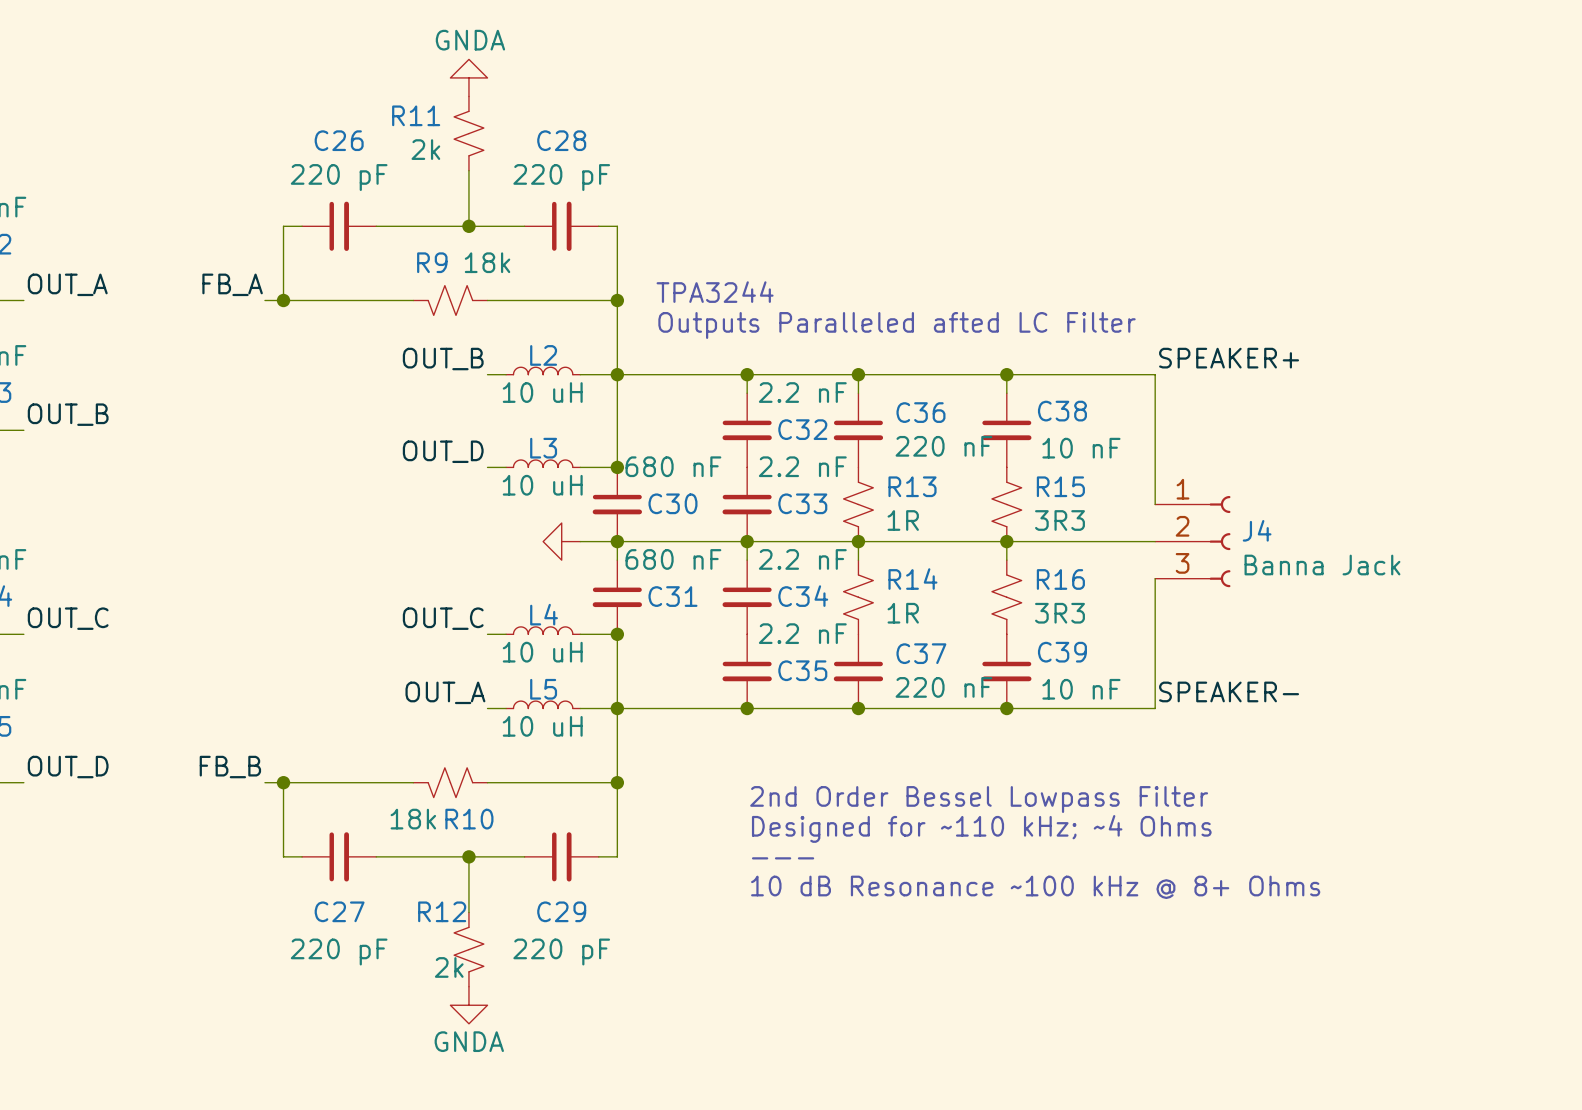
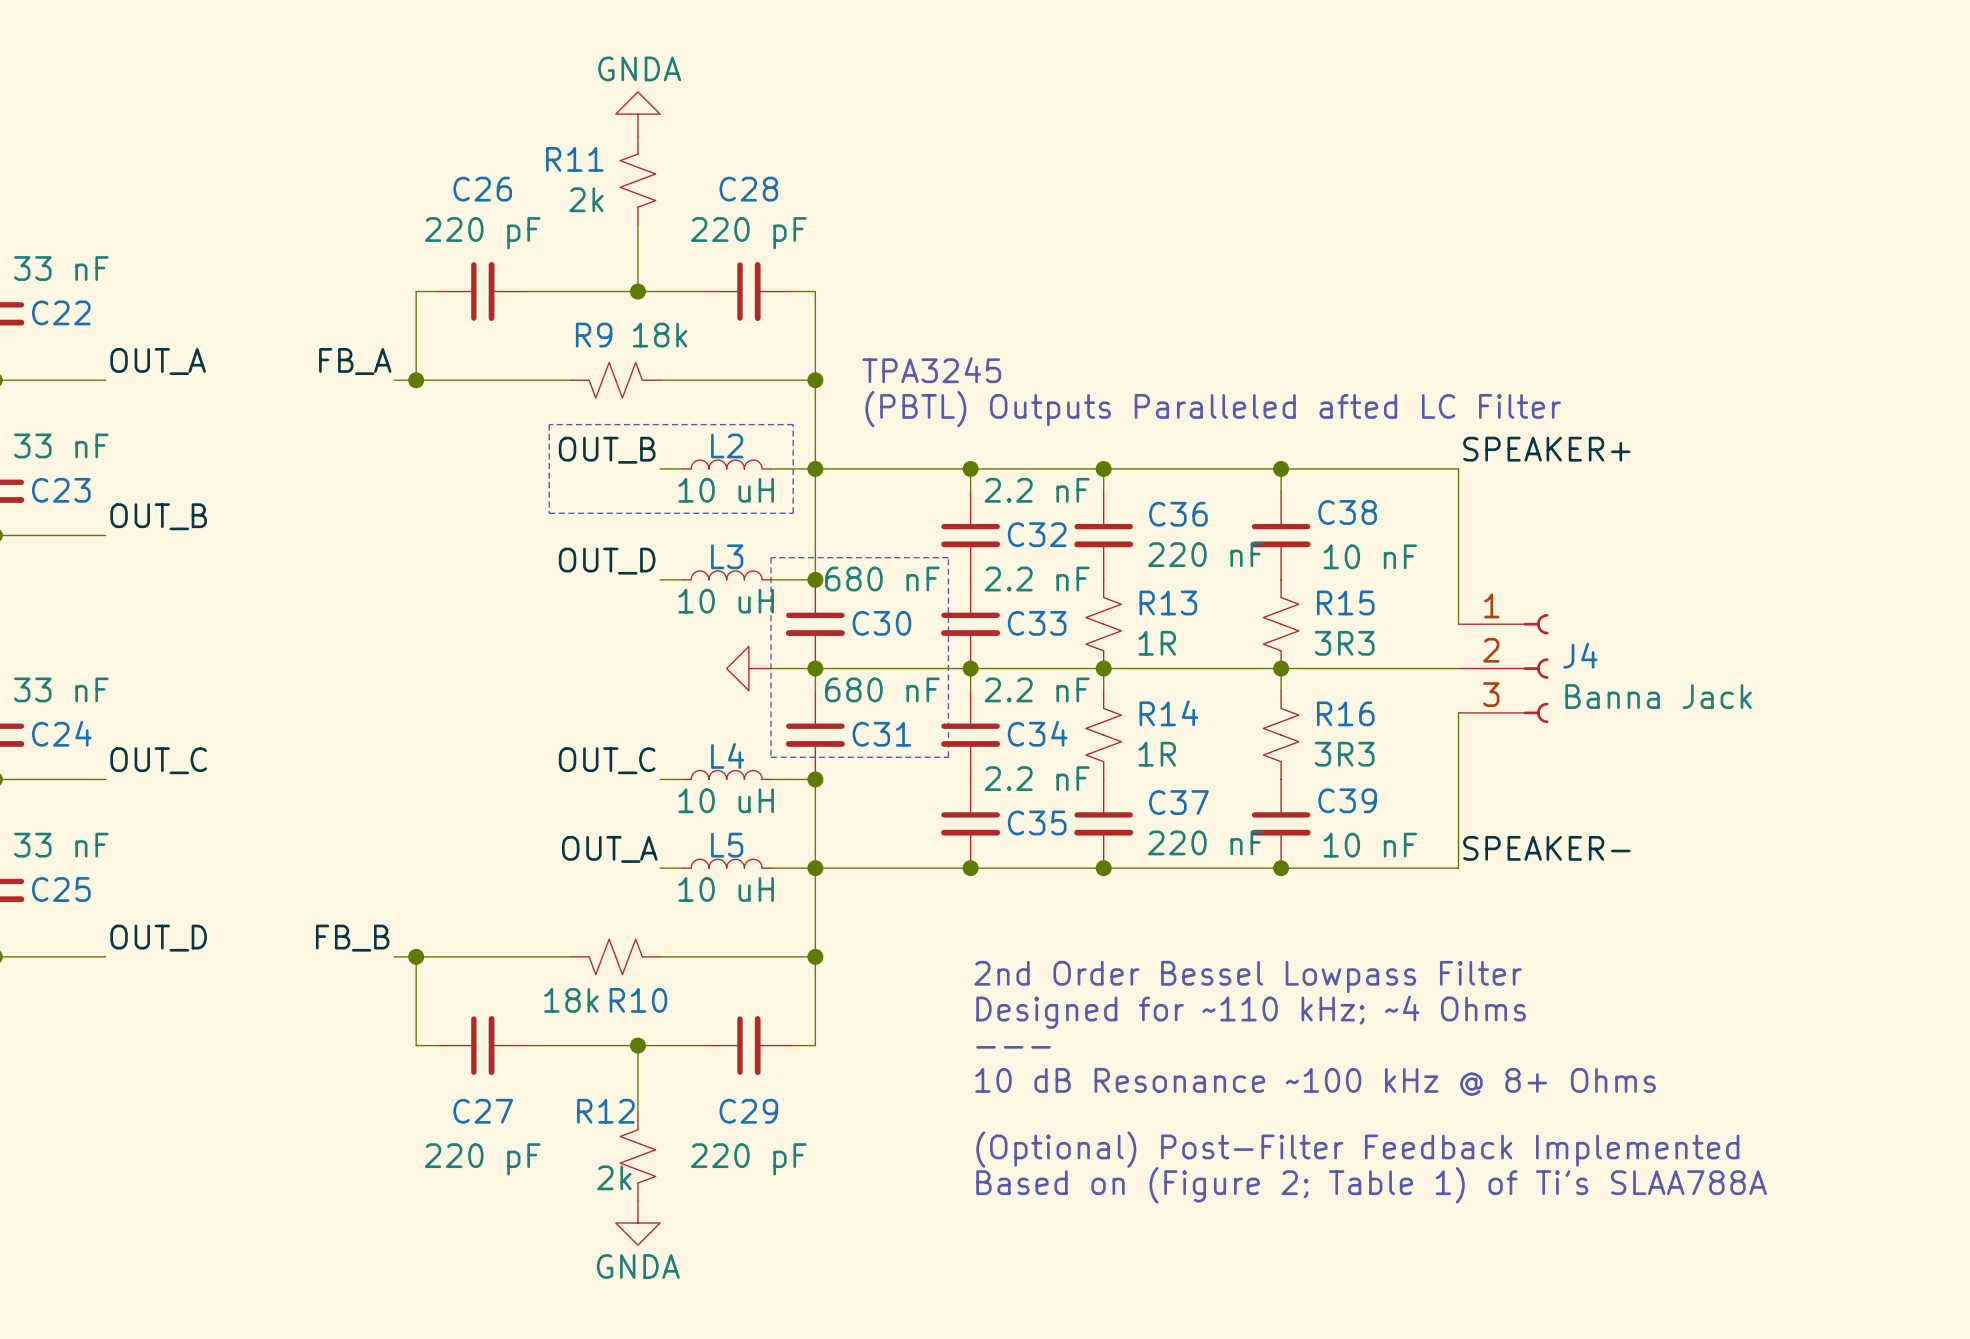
text: TPA3244 (715, 292) -> TPA3245 (931, 370)
text: Outputs Paralleled afted LC Filter (897, 325) -> (PBTL) Outputs Paralleled afted LC Filter (1213, 409)
line: none -> (549, 424) (793, 424) (793, 513) (549, 513) (549, 424)
line: none -> (771, 557) (948, 557) (948, 757) (771, 757) (771, 557)
text: none -> (Optional) Post-Filter Feedback Implemented (1357, 1149)
text: none -> Based on (Figure 2; Table 1) of Ti's SLAA788A (1371, 1185)

